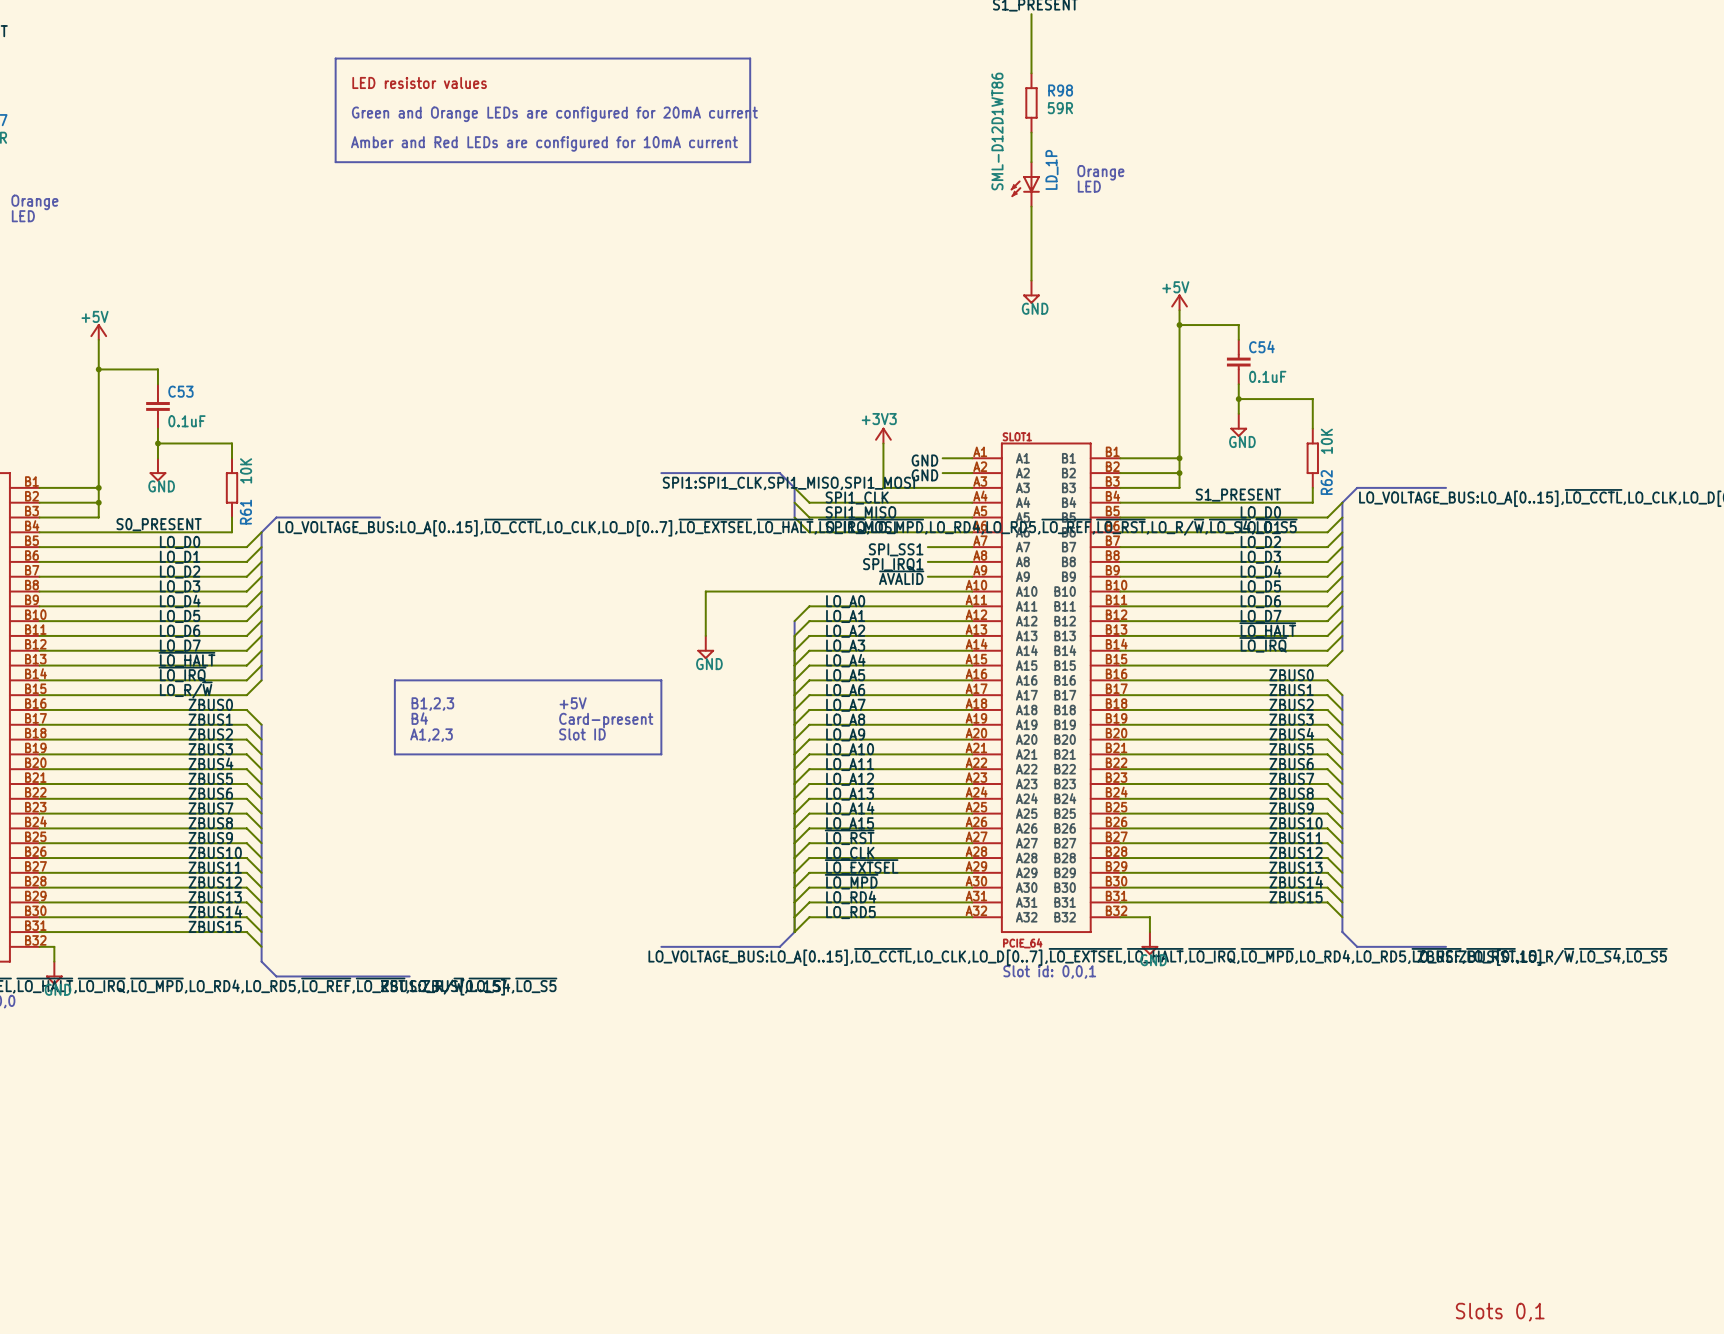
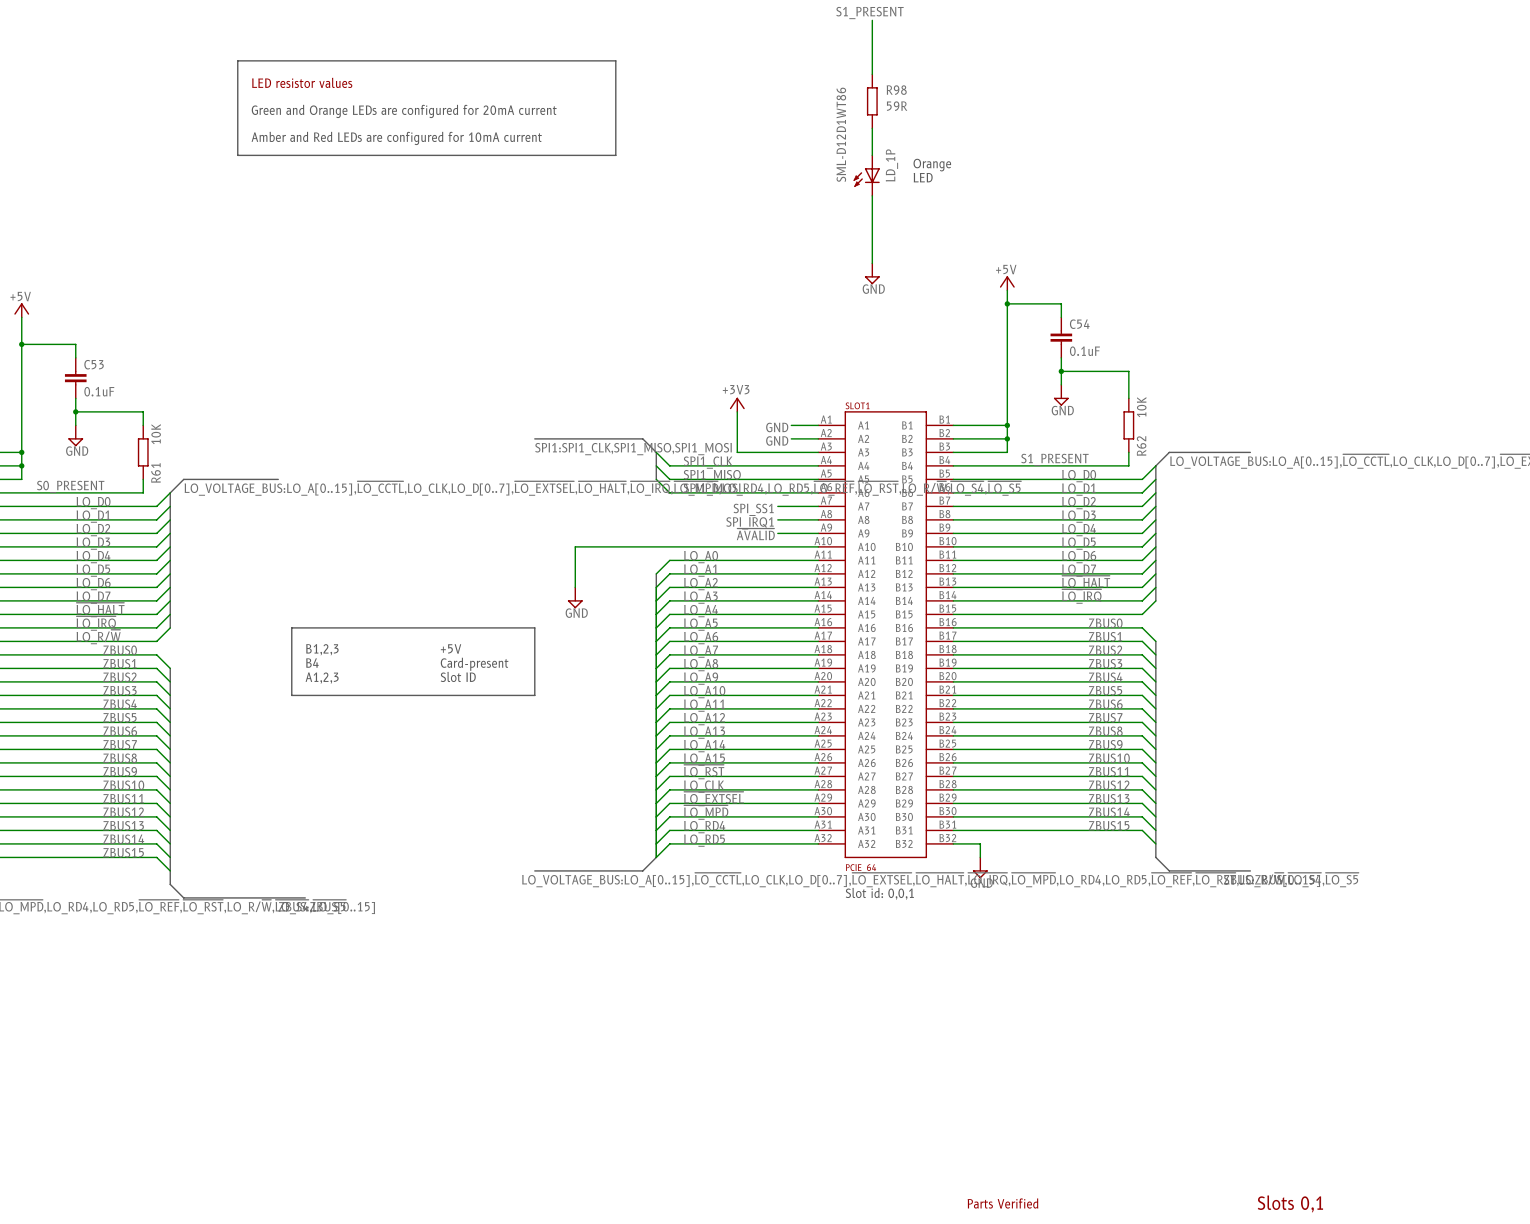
text: none -> Parts Verified (1002, 1203)

